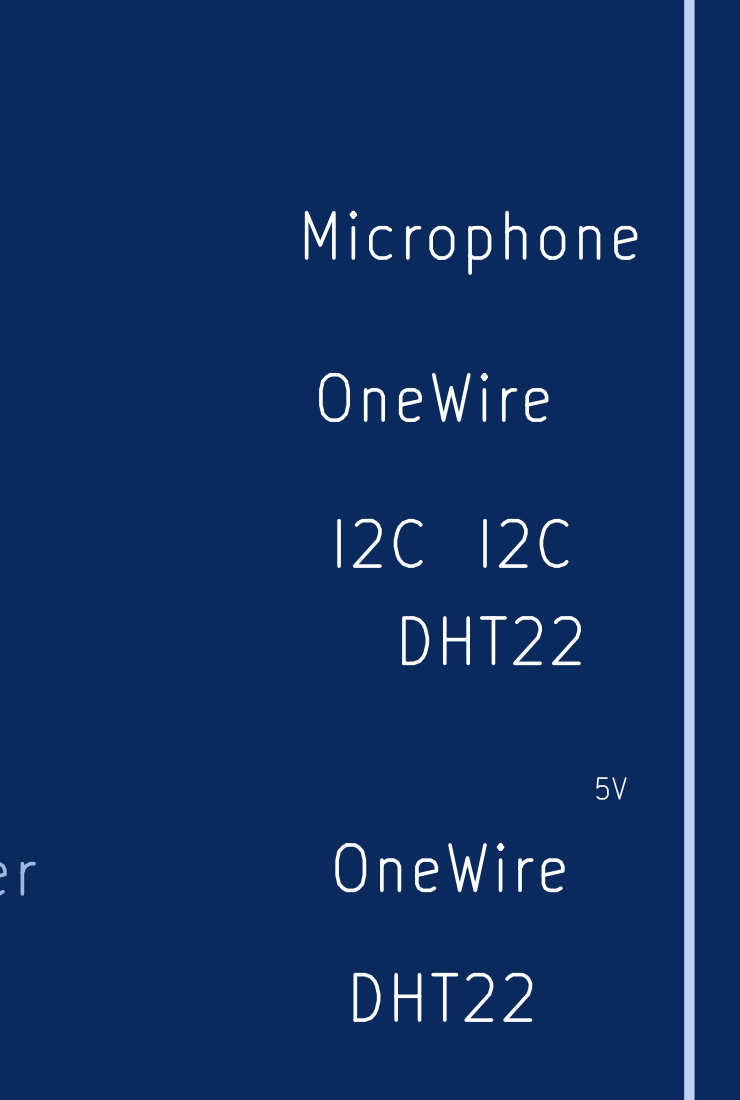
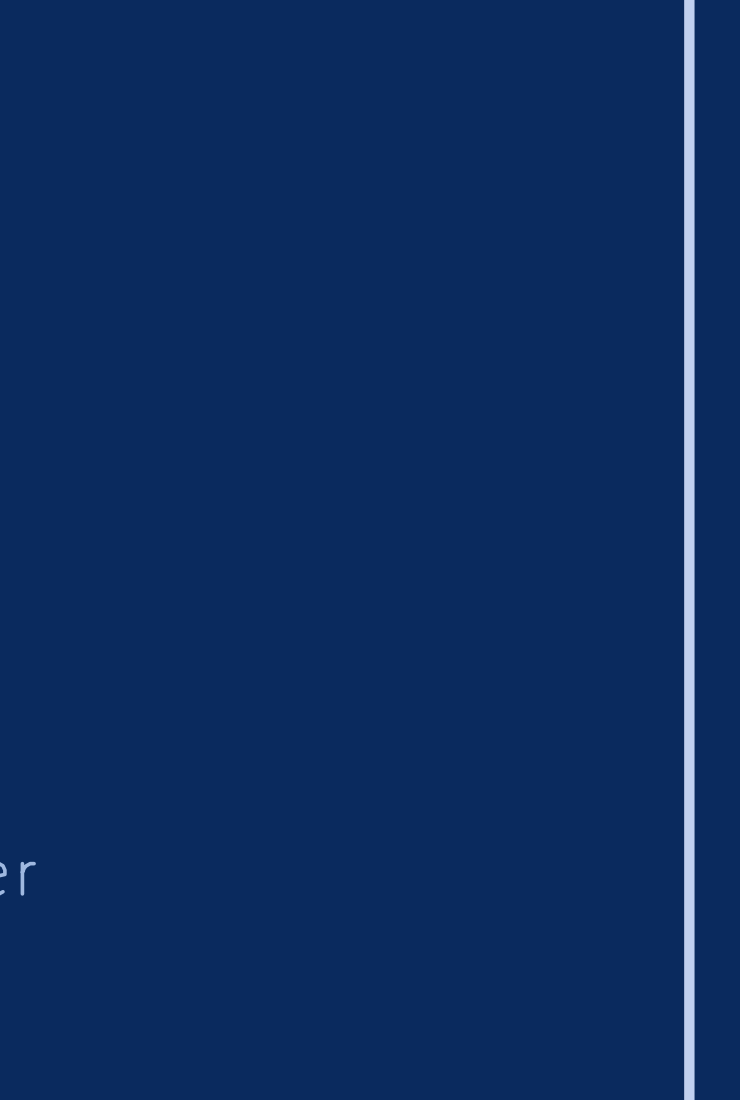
text: Microphone (471, 242) -> none
text: OneWire (433, 397) -> none
text: I2C (379, 543) -> none
text: I2C (525, 543) -> none
text: DHT22 (491, 640) -> none
text: 5V (611, 788) -> none
text: OneWire (449, 867) -> none
text: DHT22 (442, 997) -> none

